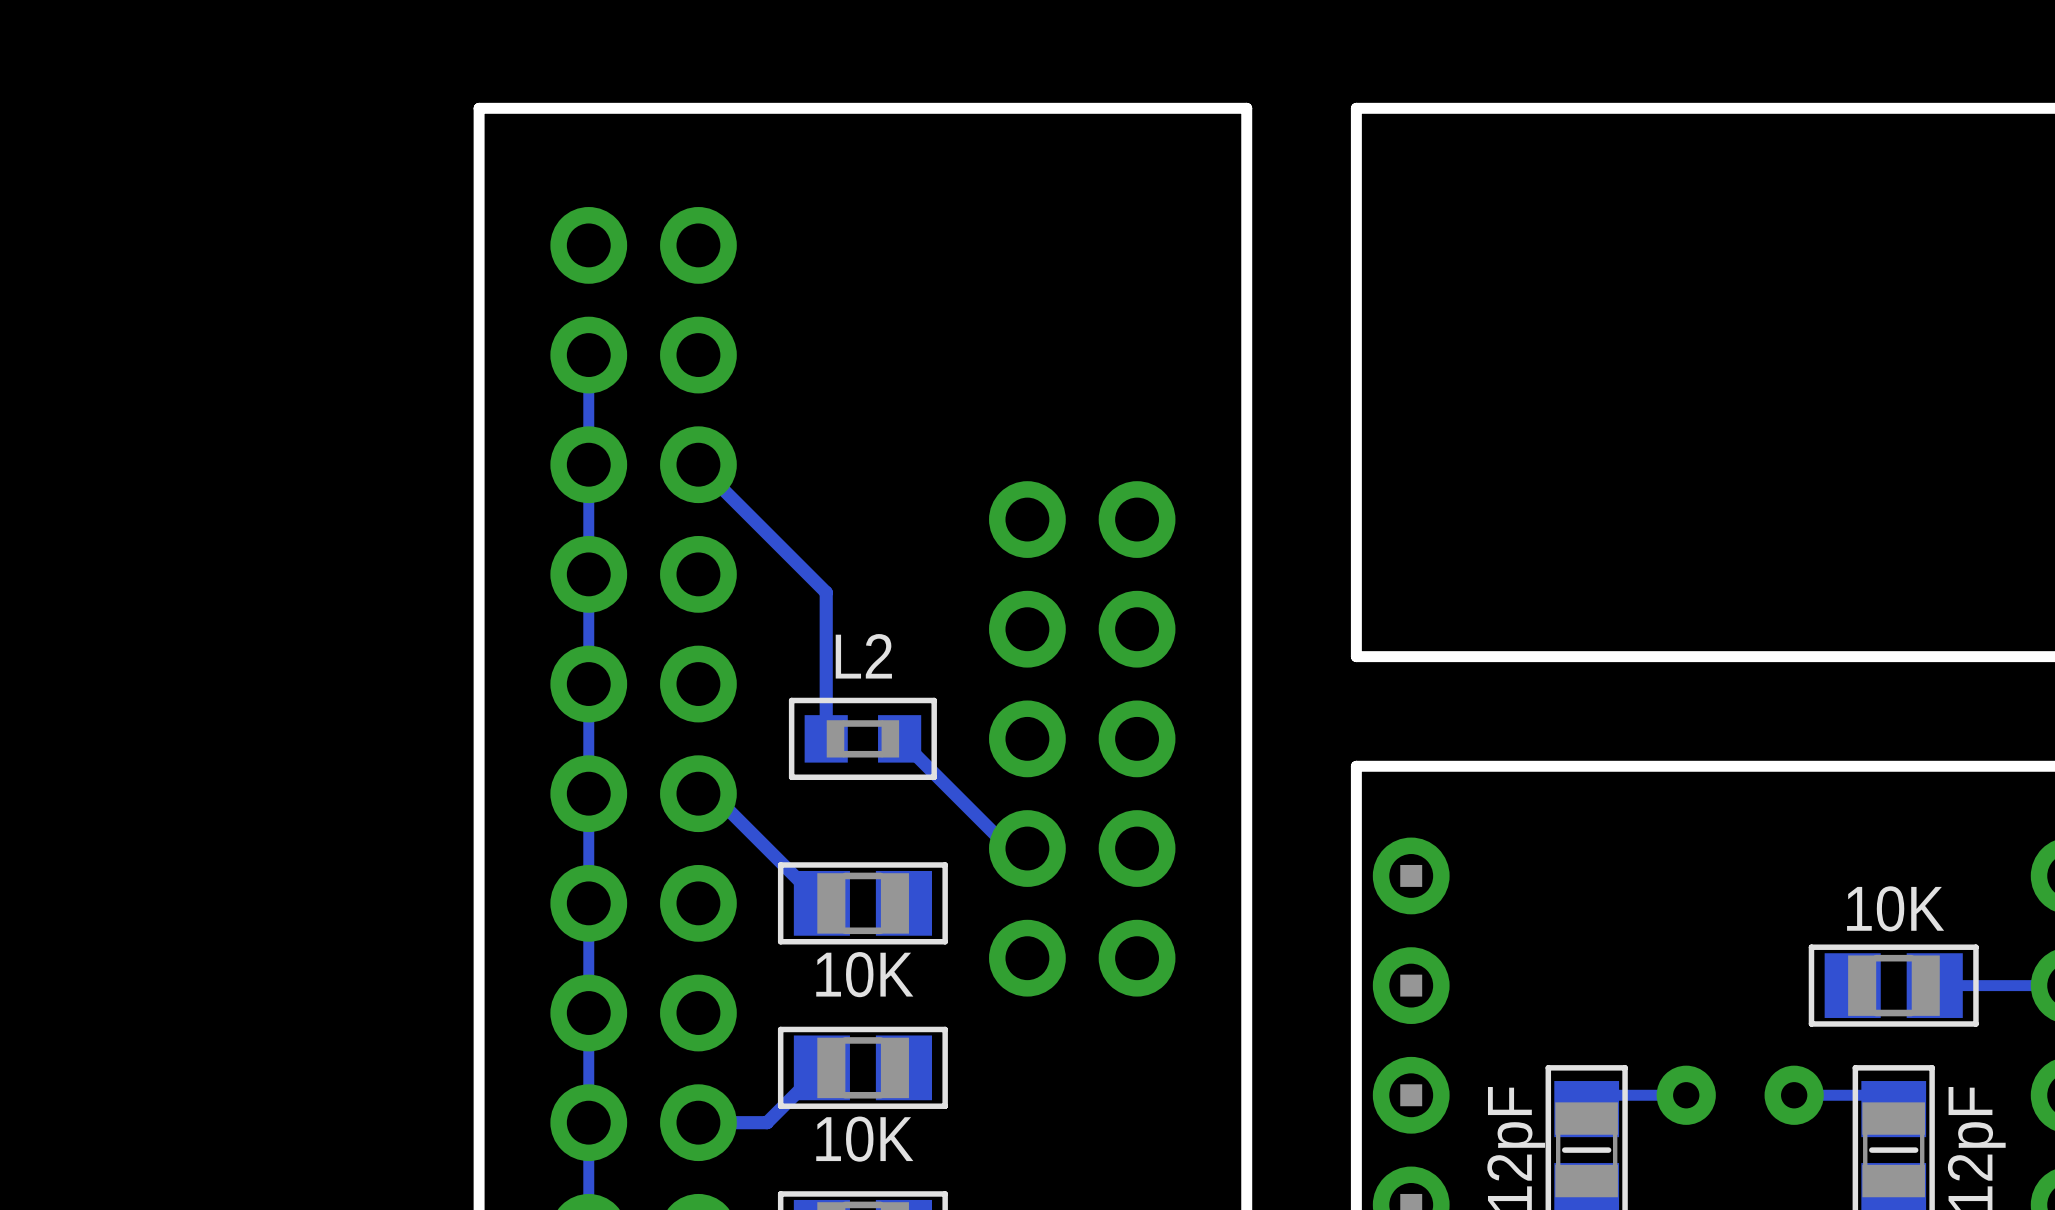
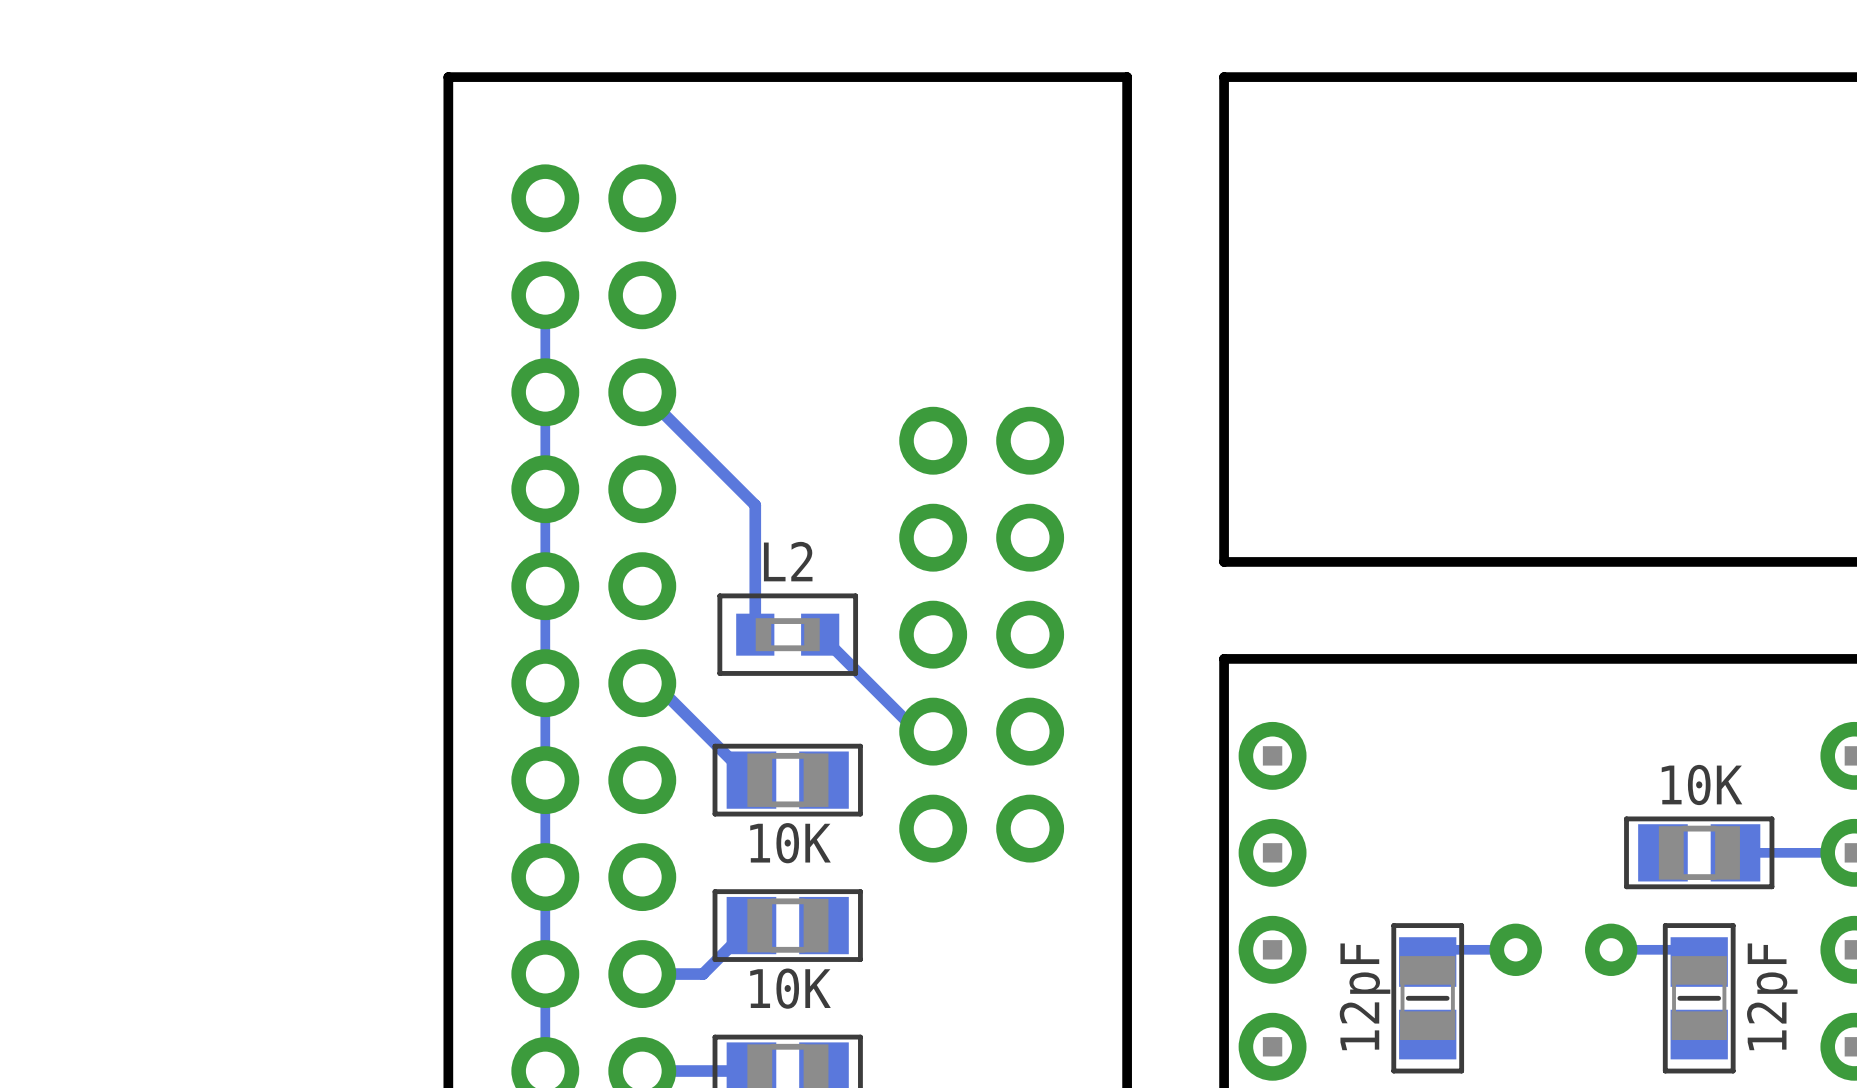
L2 footprint: [788, 697, 937, 780] -> [717, 593, 859, 676]

